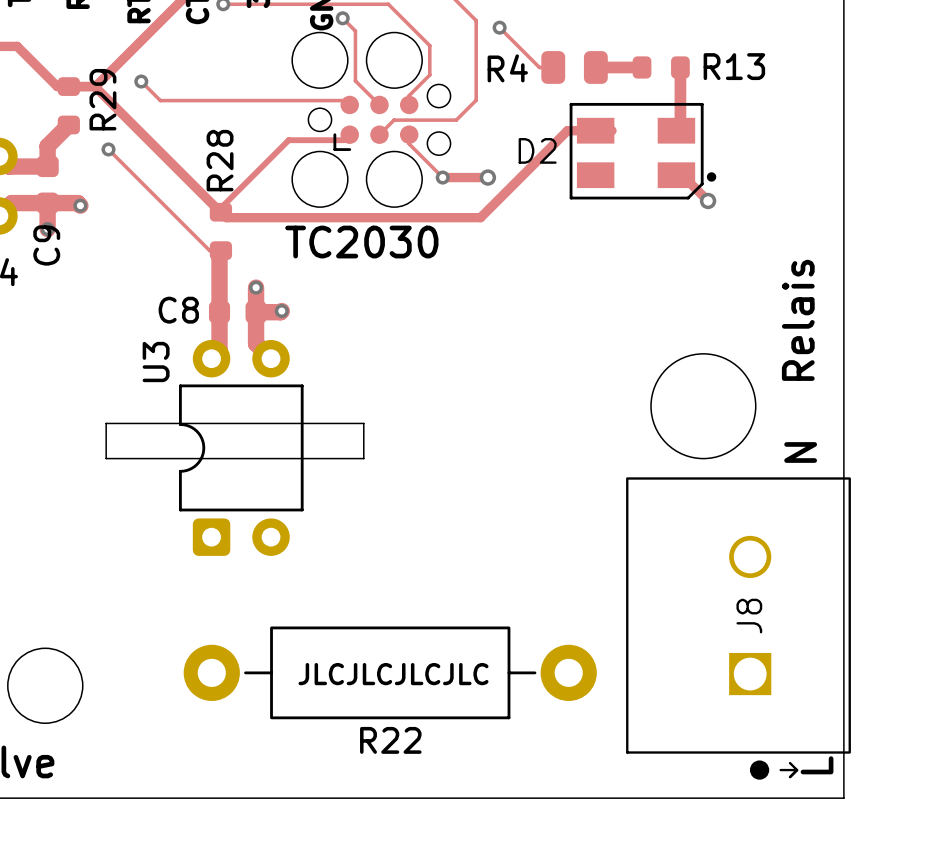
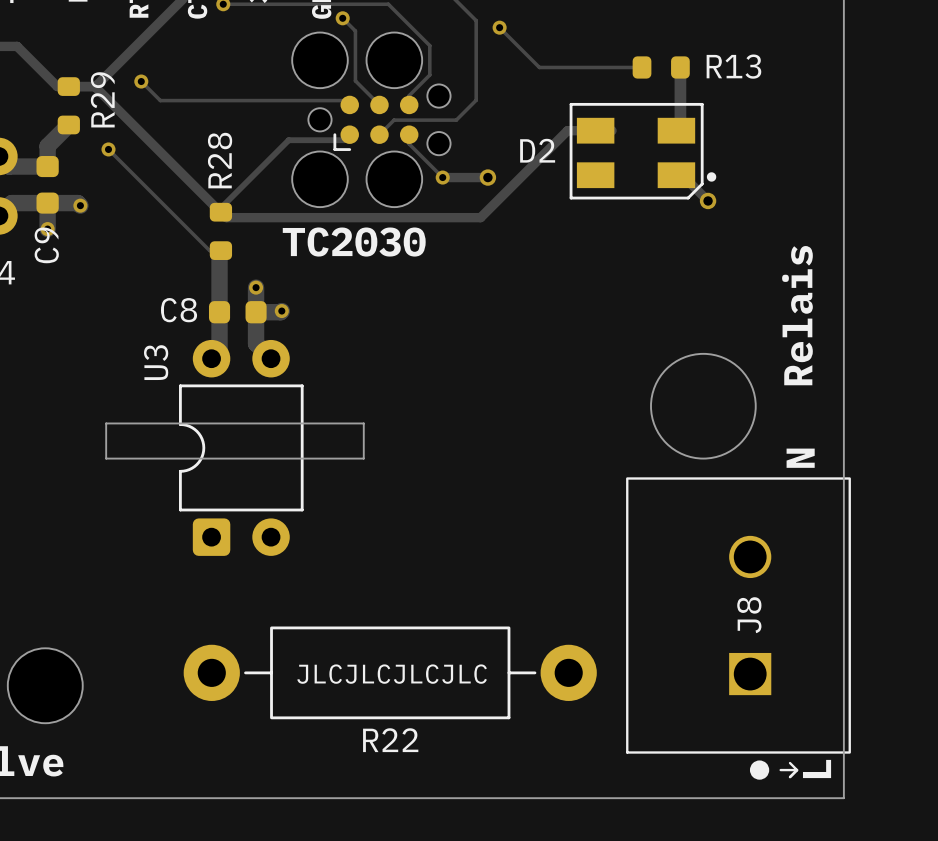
track: none -> (553, 67) (595, 67)
R4: (574, 67) -> none
track width: thick (595, 67) (642, 67) -> thin (595, 67) (642, 67)

